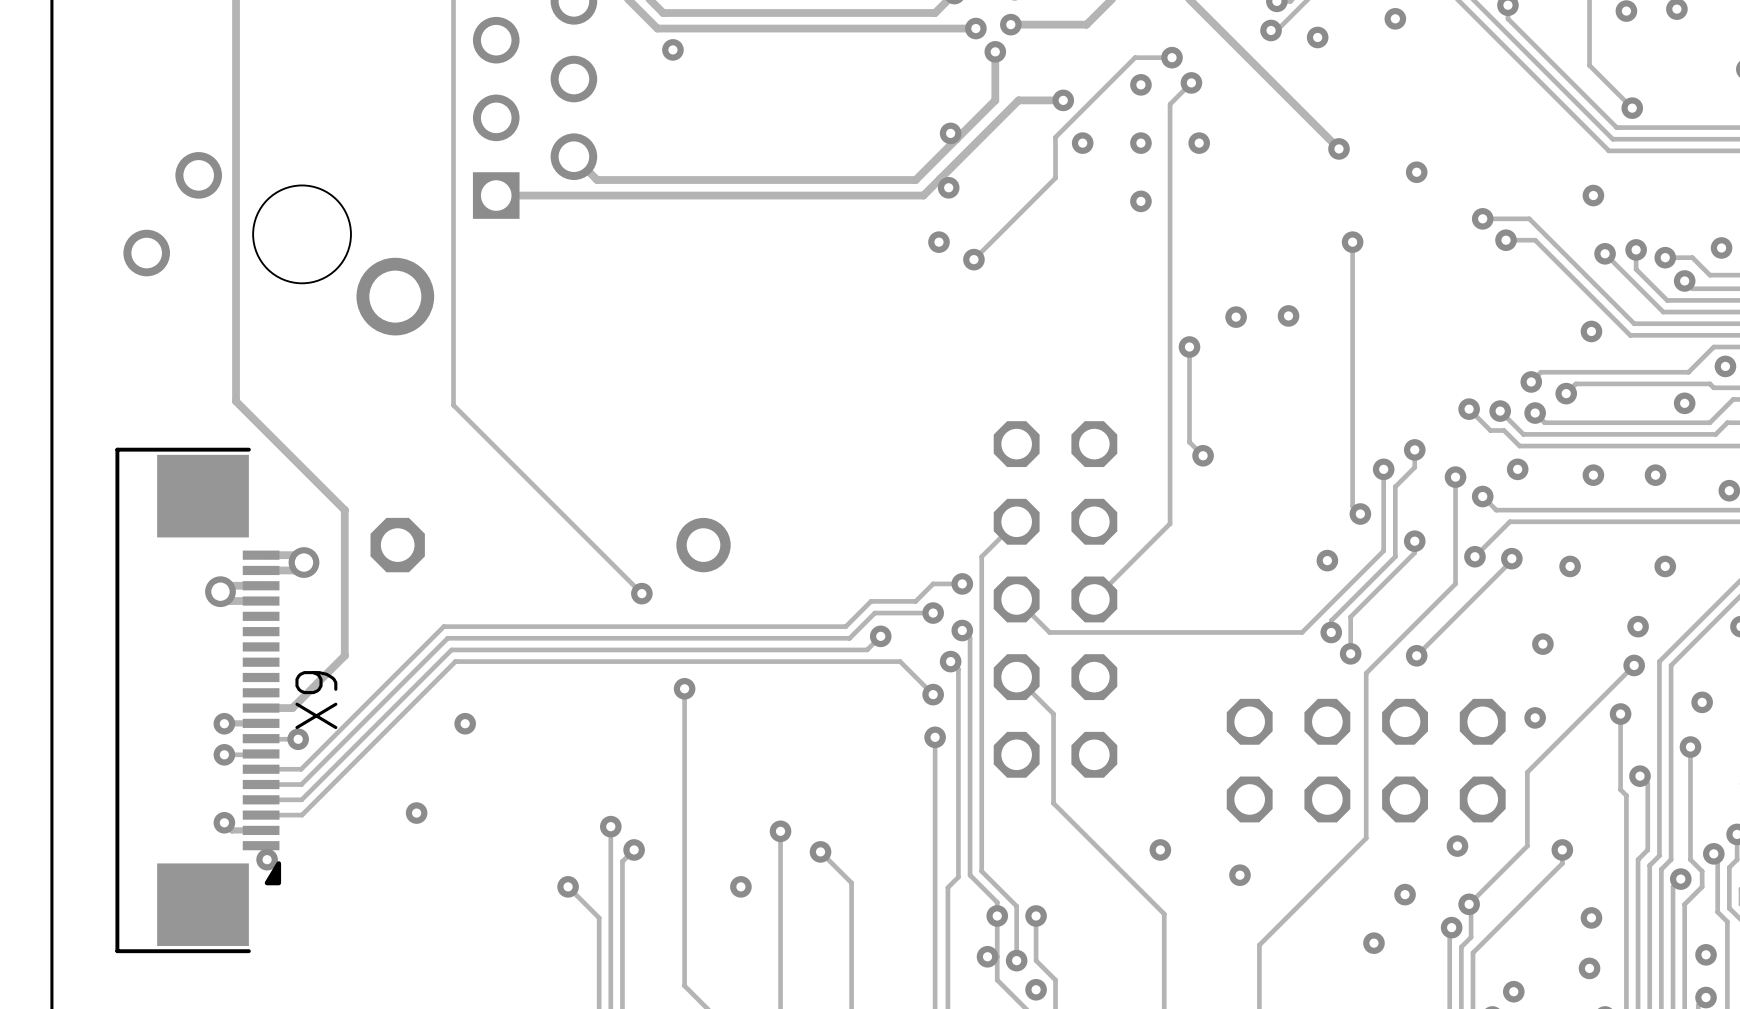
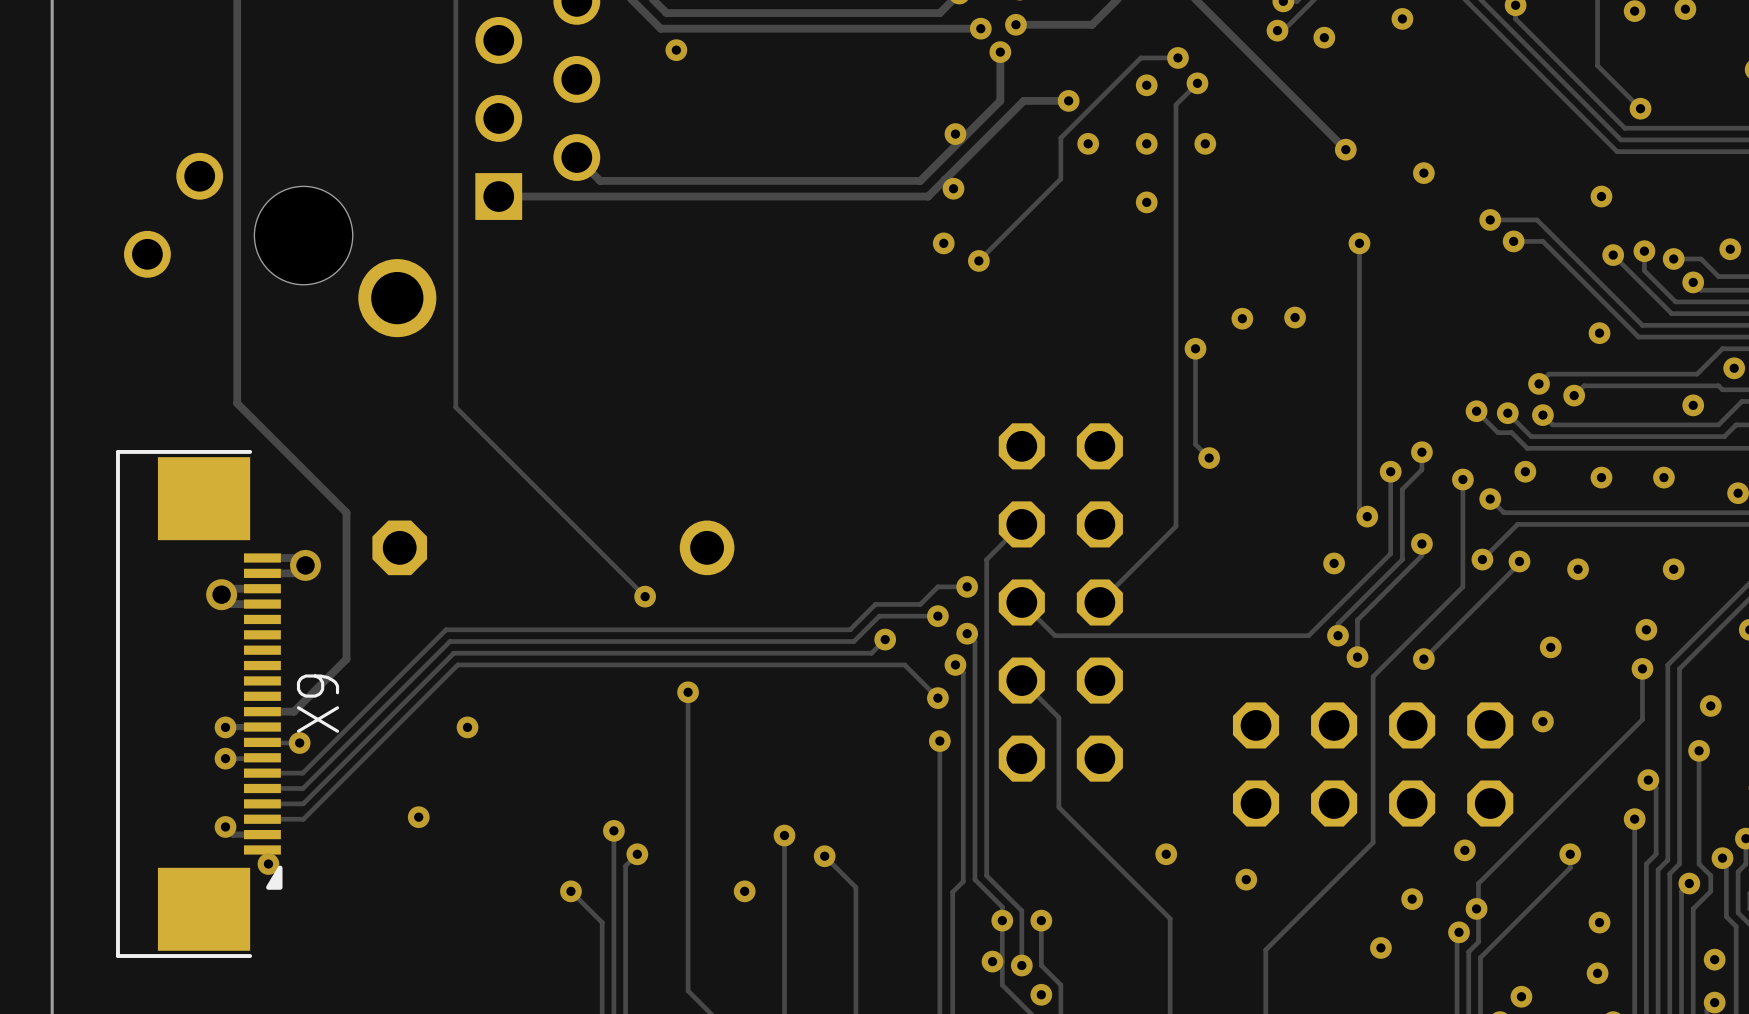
track: (1634, 665) (1527, 772) (1527, 846) (1471, 902) -> (1642, 668) (1642, 719) (1478, 883) (1478, 906)
track: (1620, 714) (1620, 789) (1626, 795) (1626, 815) -> none
via position: (1620, 714) -> (1634, 819)

